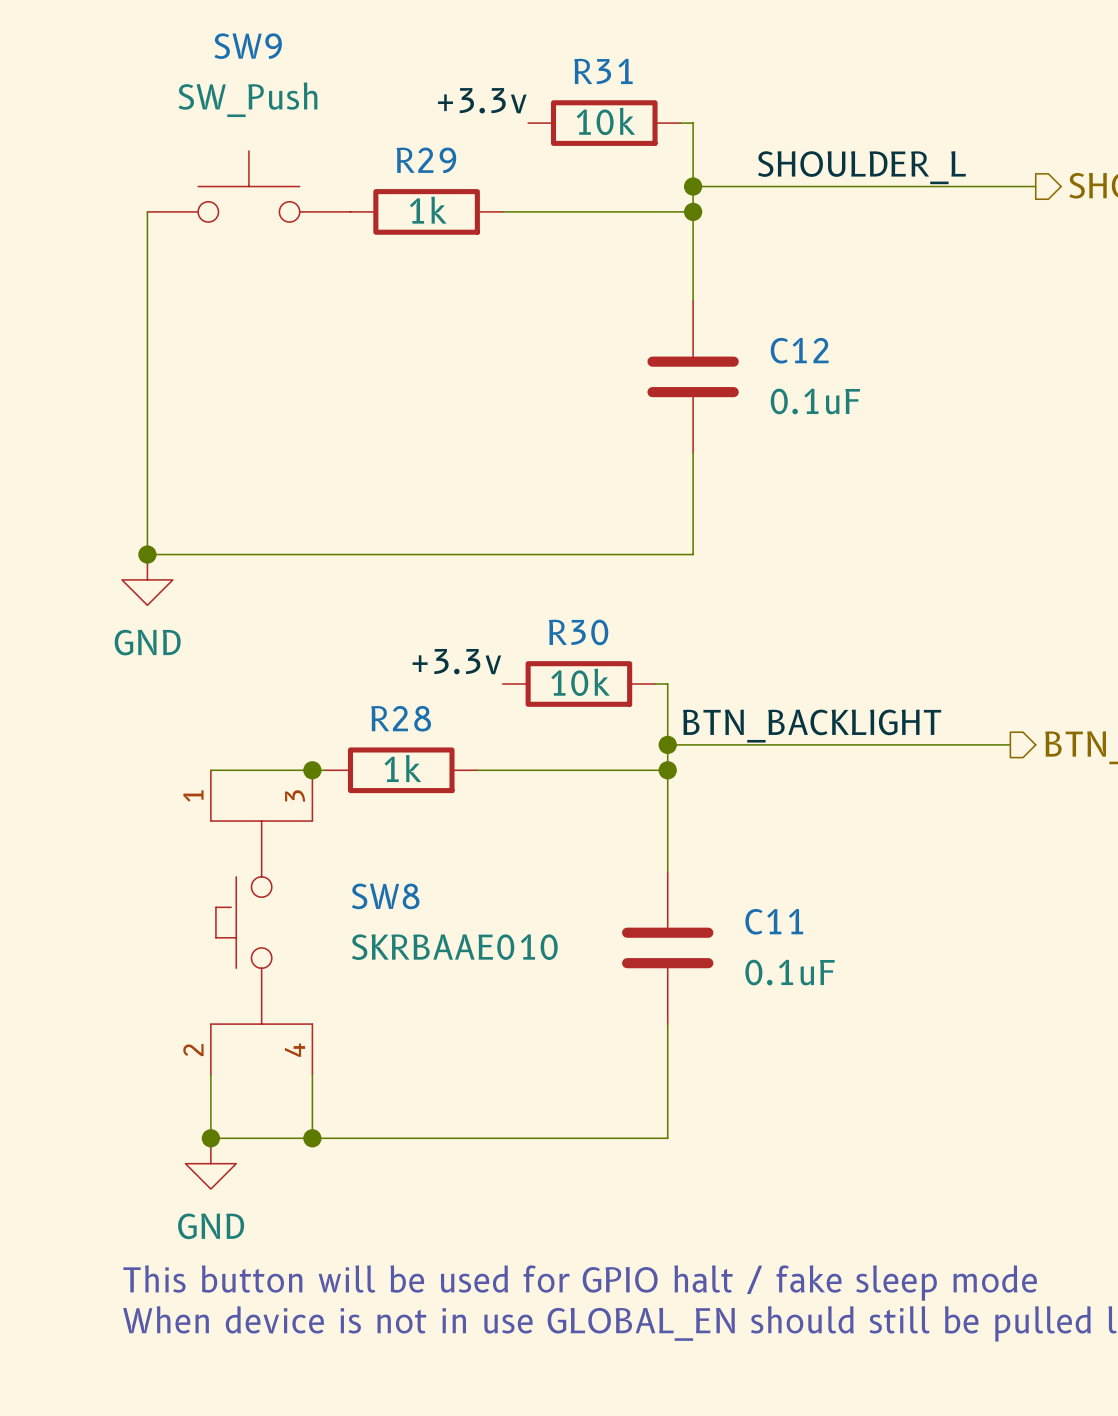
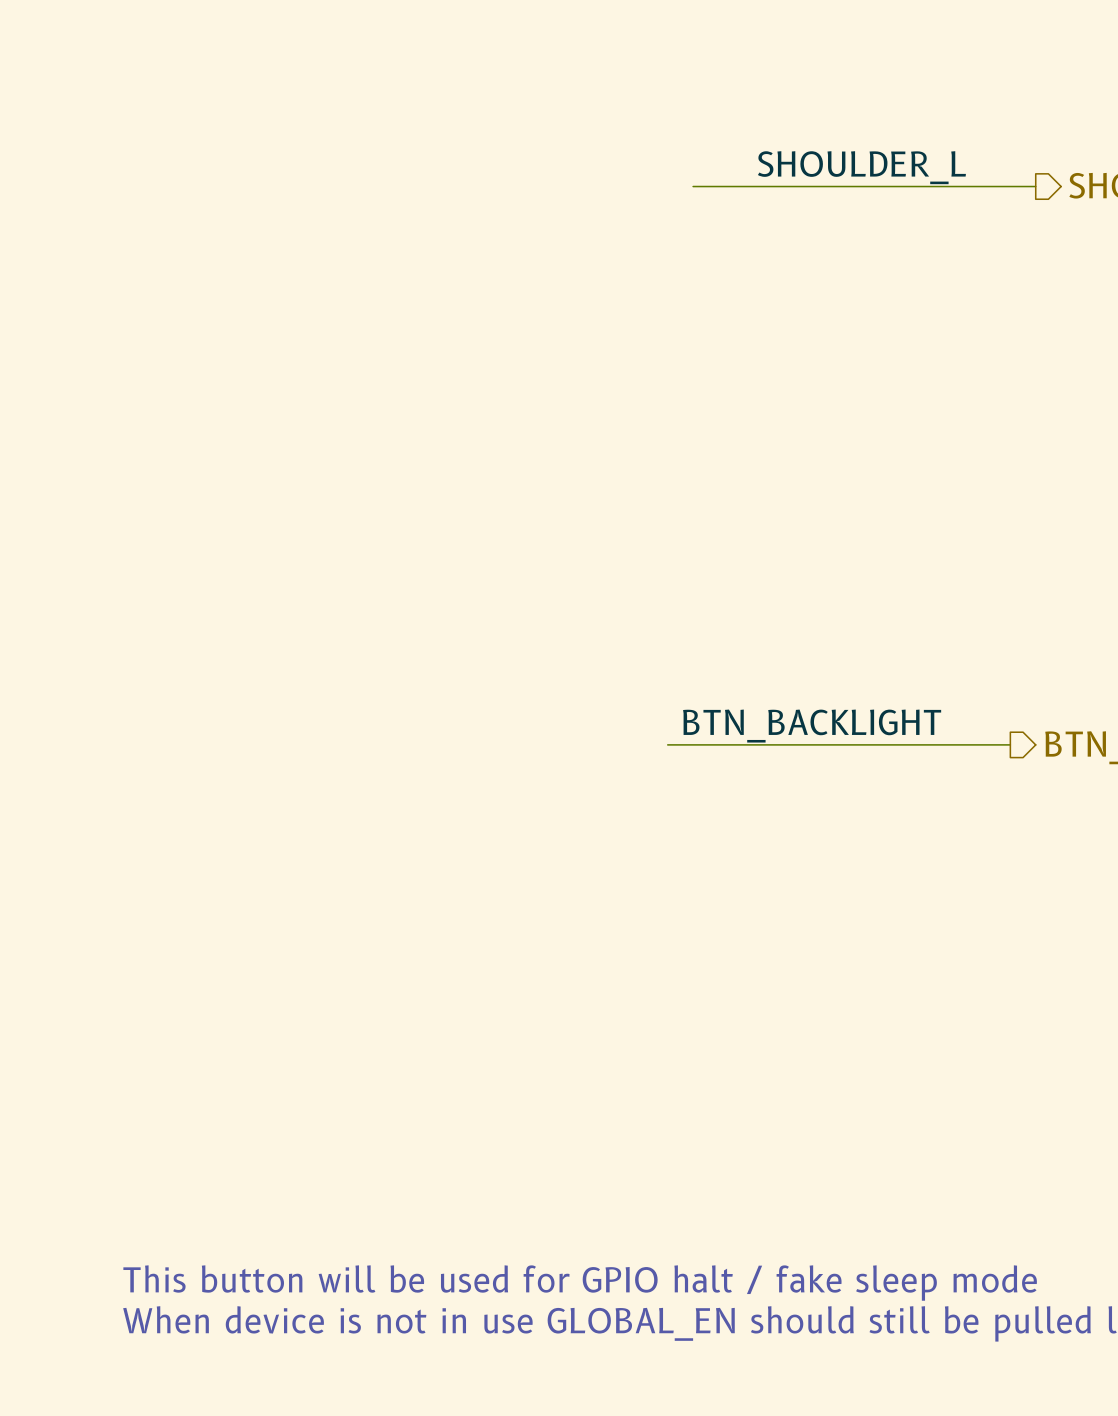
label: +3.3v (482, 100) -> none
R31: 10k (604, 123) -> none
wire: (680, 123) (693, 123) (693, 300) -> none
SW9: SW_Push (248, 186) -> none
junction: (693, 186) -> none
wire: (147, 211) (147, 554) (693, 554) (693, 453) -> none
R29: 1k (426, 211) -> none
wire: (502, 211) (693, 211) -> none
junction: (693, 211) -> none
C12: 0.1uF (693, 376) -> none
junction: (147, 554) -> none
power symbol: GND (147, 579) -> none
label: +3.3v (456, 661) -> none
R30: 10k (578, 683) -> none
wire: (655, 683) (667, 683) (667, 871) -> none
junction: (667, 744) -> none
wire: (210, 770) (325, 770) -> none
junction: (312, 770) -> none
R28: 1k (401, 770) -> none
wire: (477, 770) (667, 770) -> none
junction: (667, 770) -> none
SW8: SKRBAAE010 (261, 922) -> none
C11: 0.1uF (667, 947) -> none
wire: (667, 1024) (667, 1138) (210, 1138) (210, 1074) -> none
wire: (312, 1074) (312, 1138) -> none
junction: (210, 1138) -> none
junction: (312, 1138) -> none
power symbol: GND (210, 1163) -> none

